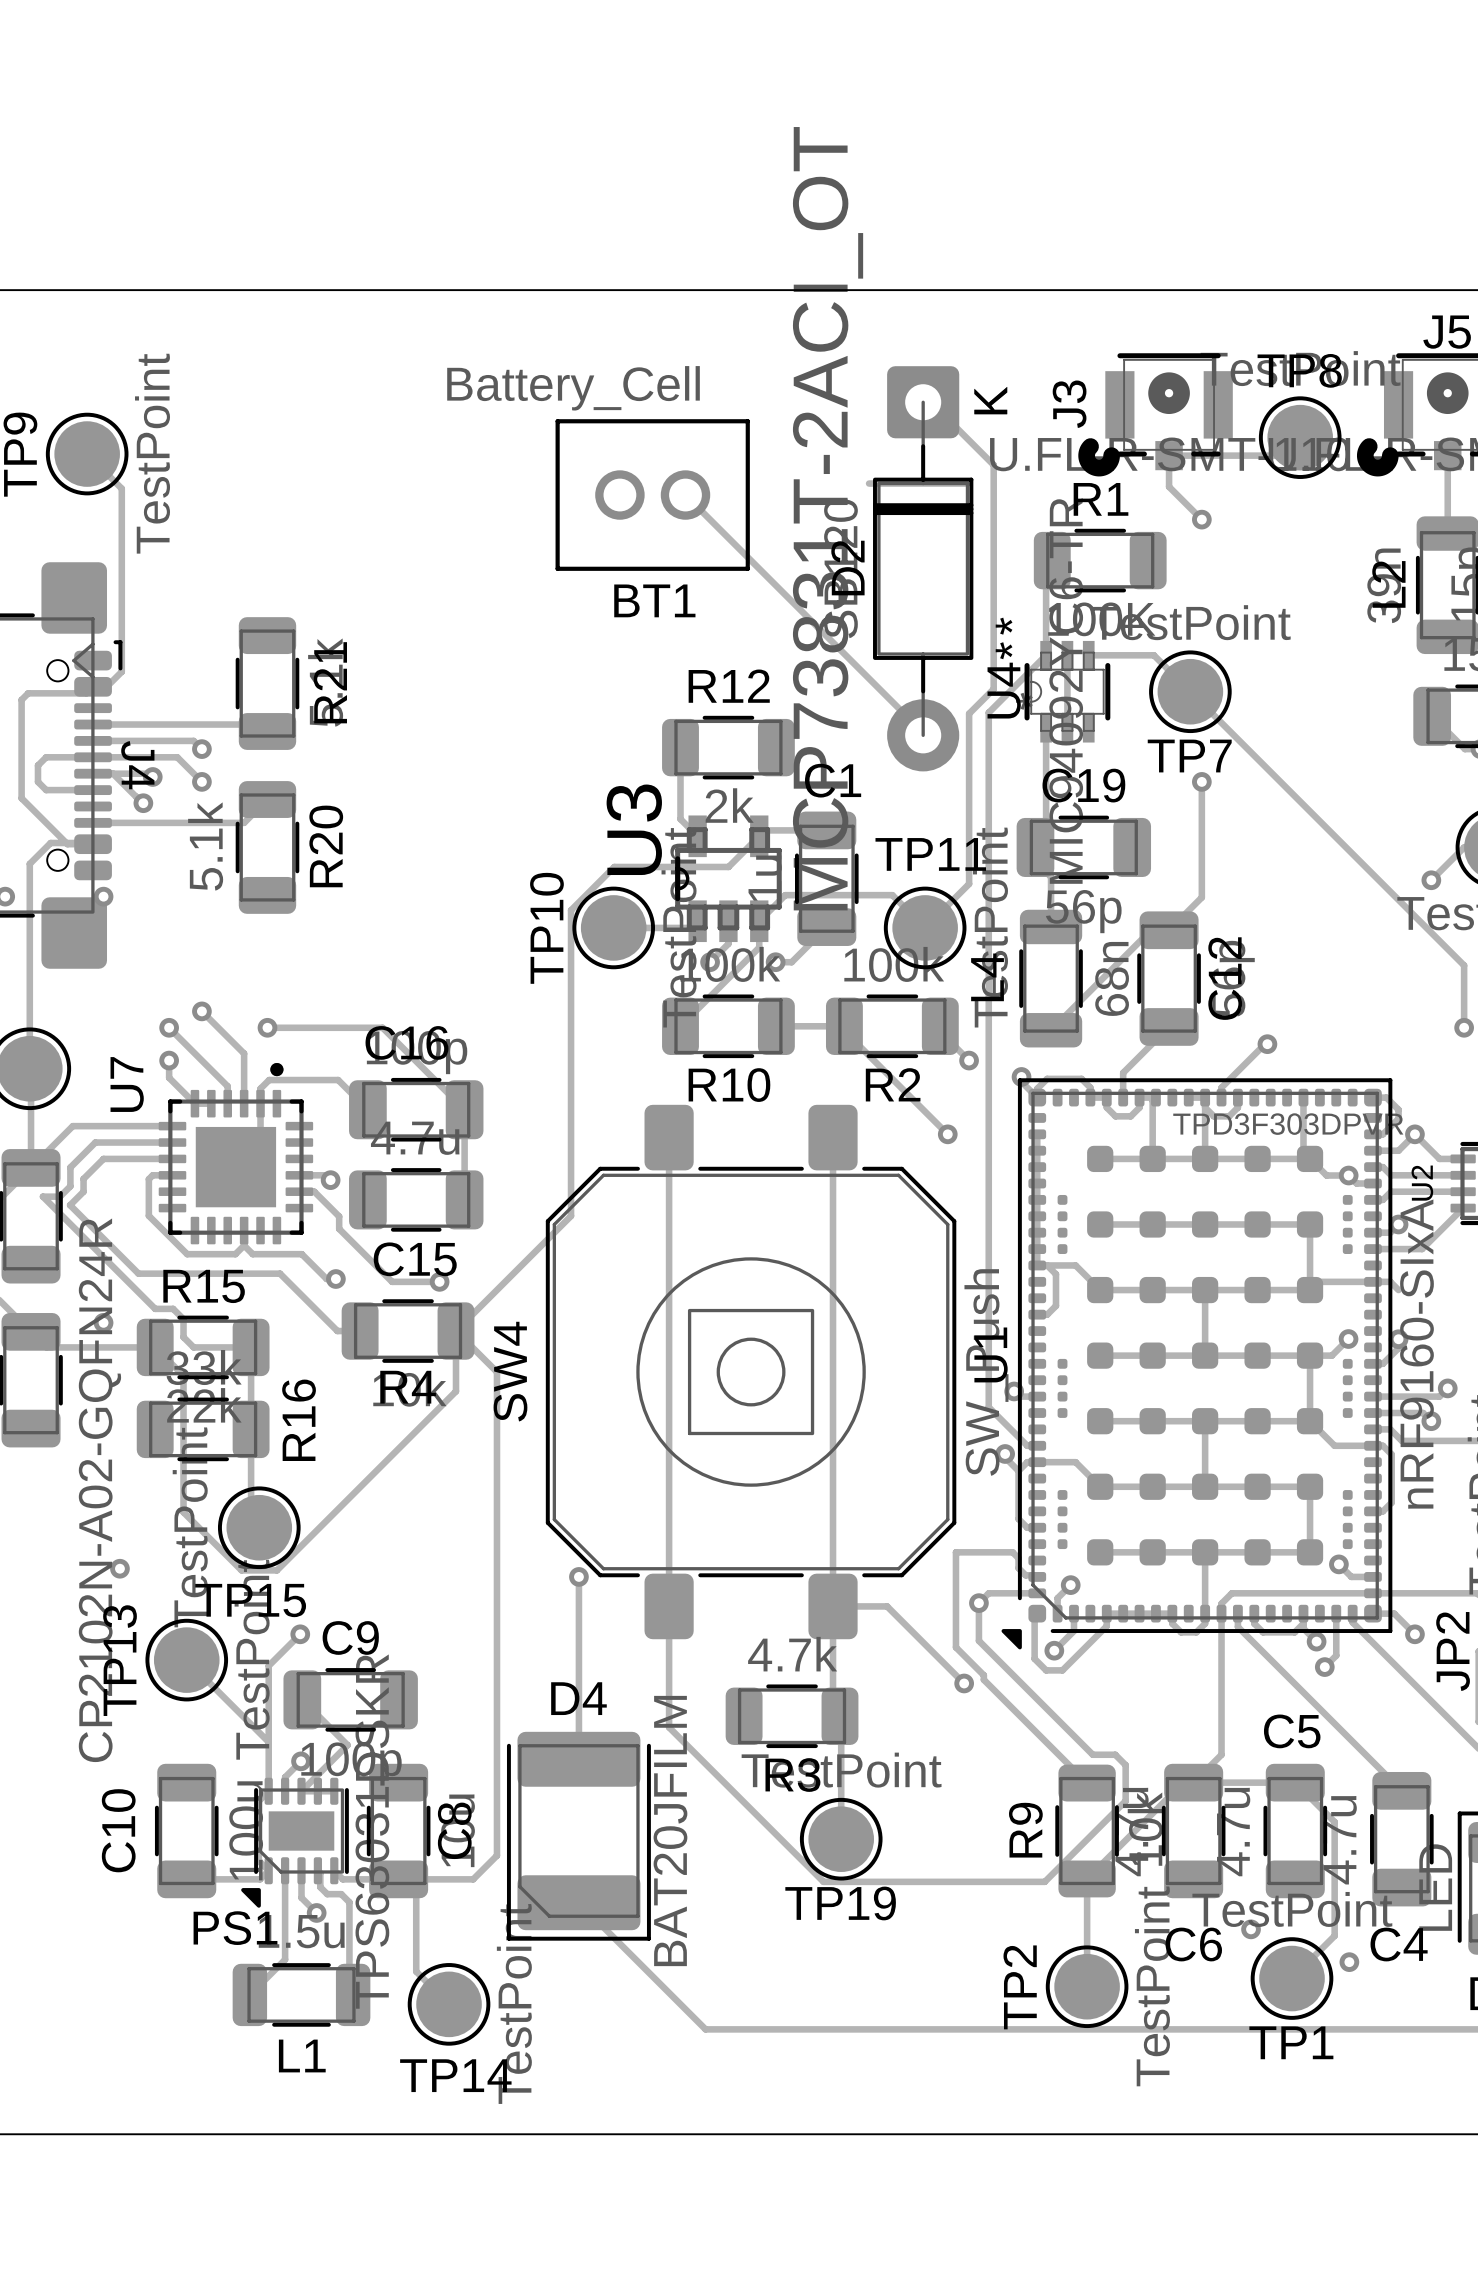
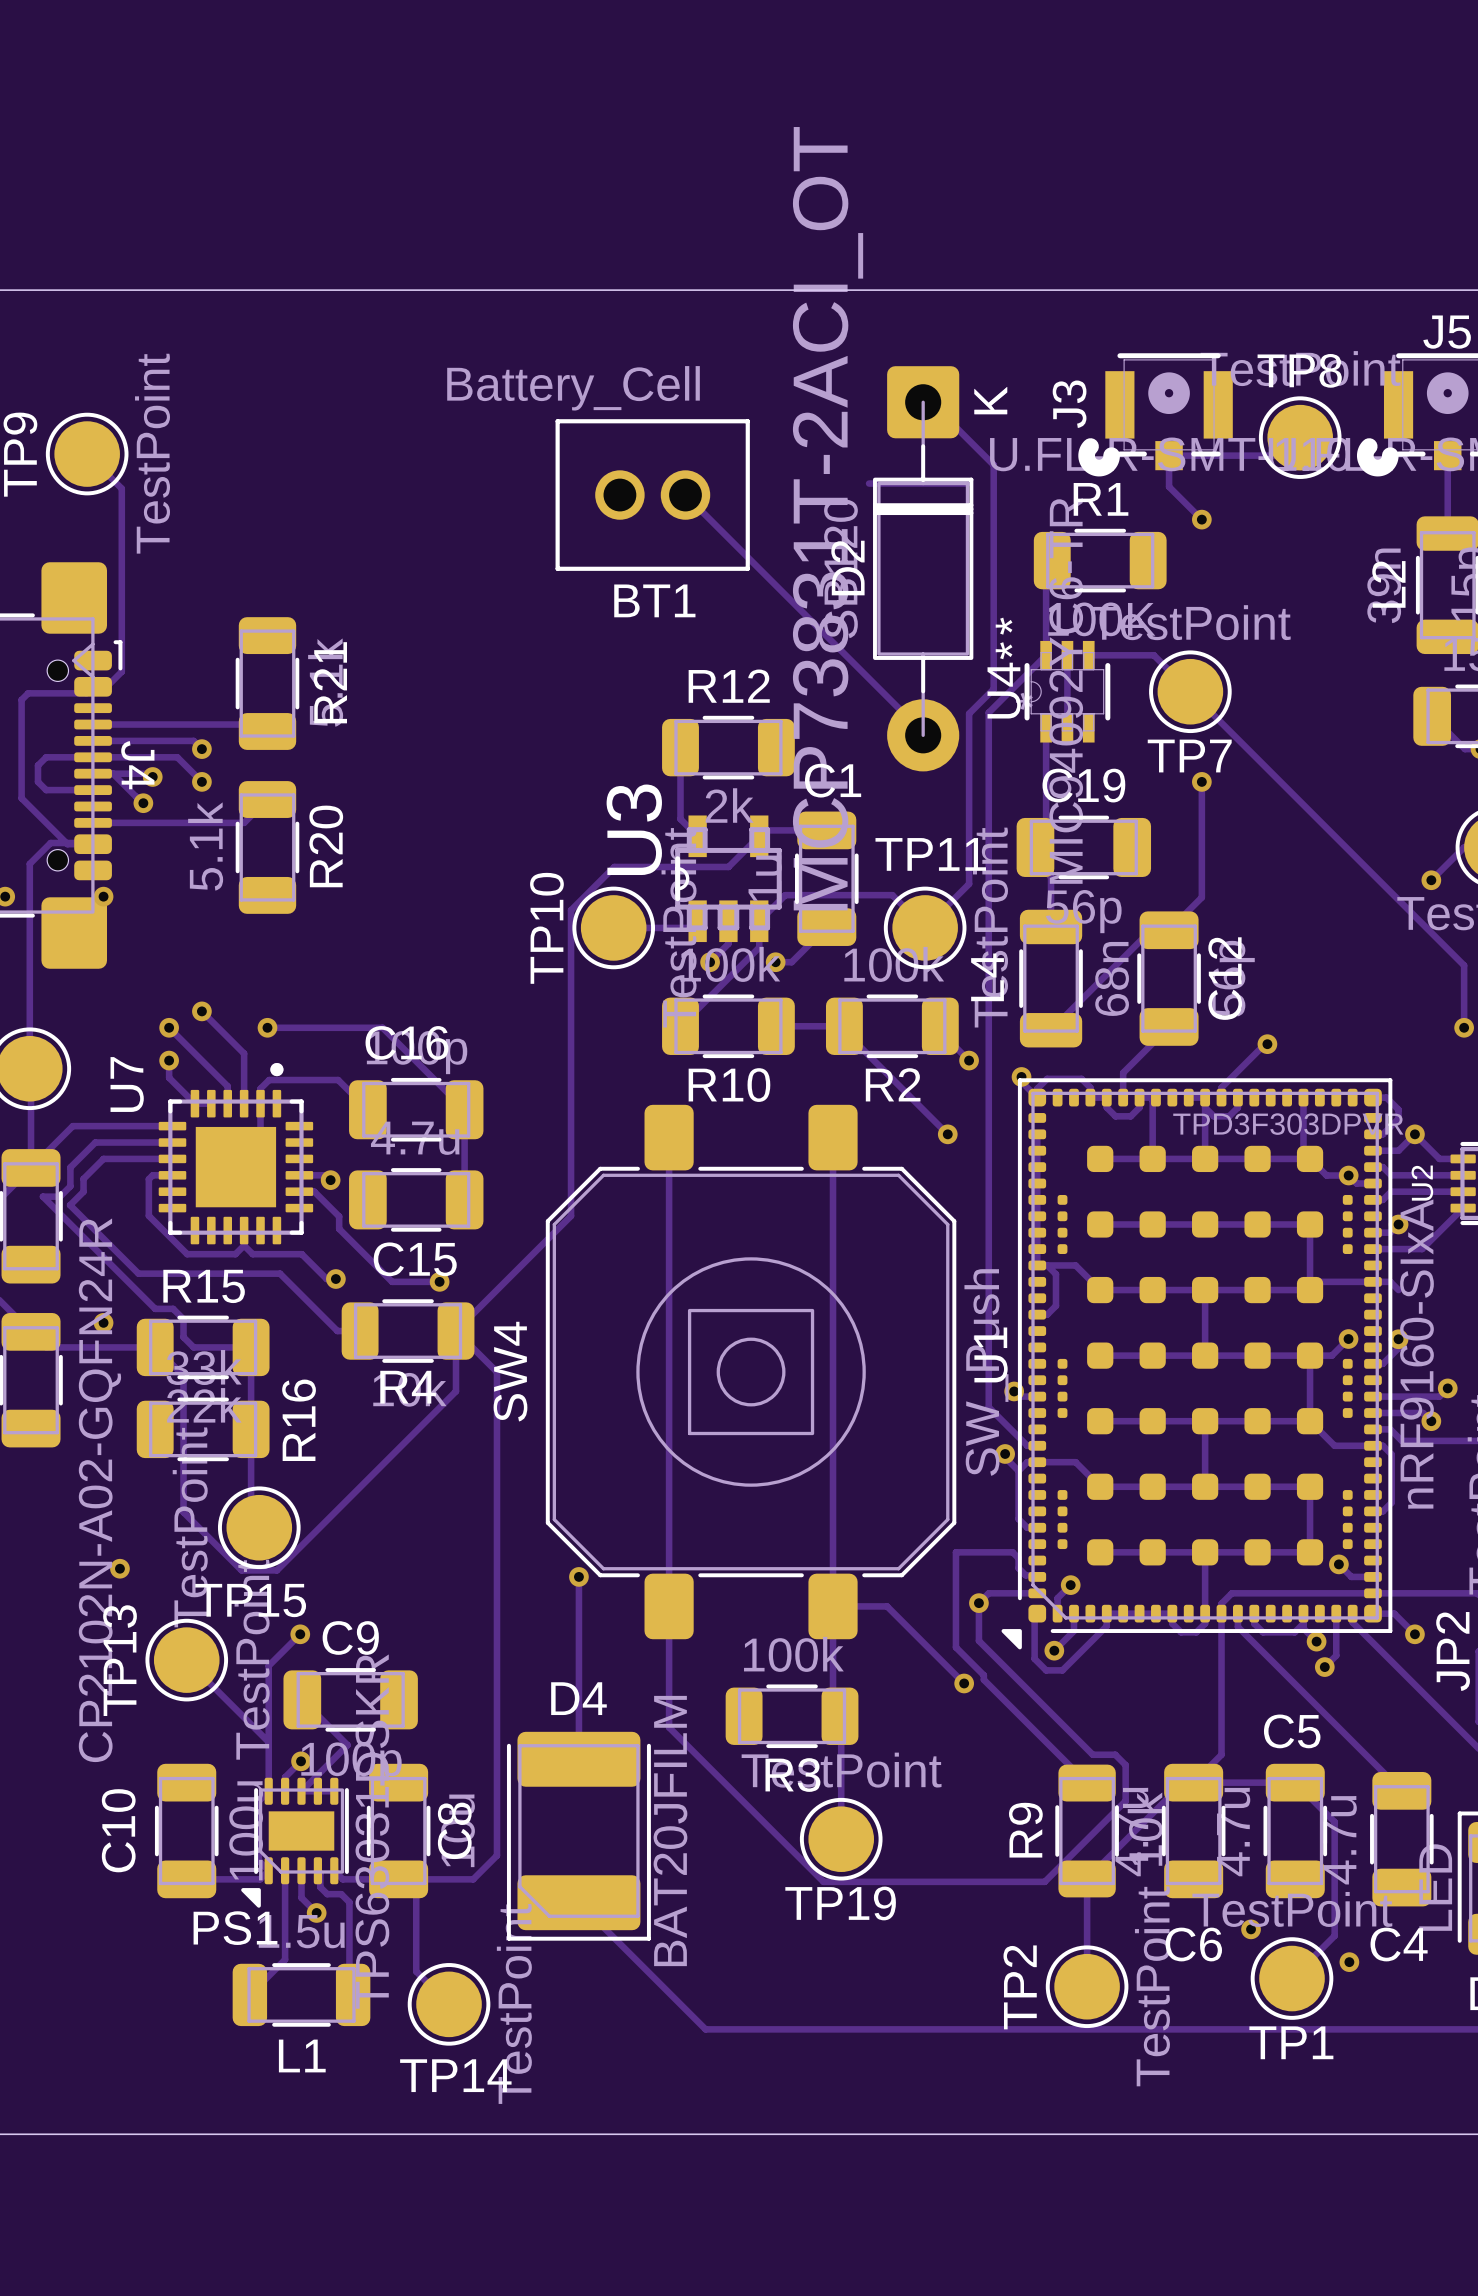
R3 value: 4.7k (792, 1654) -> 100k (793, 1654)

